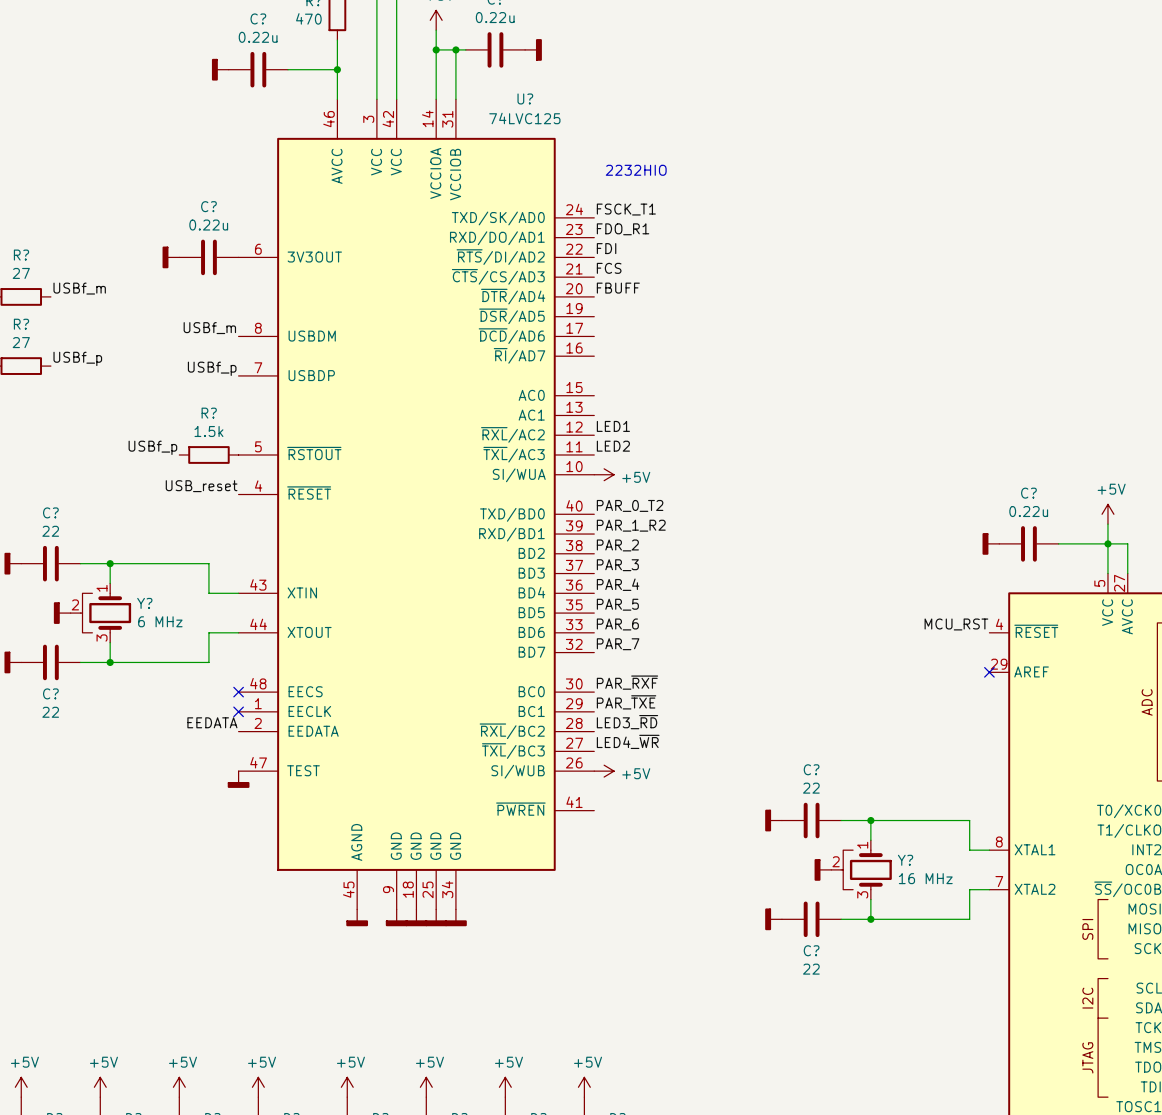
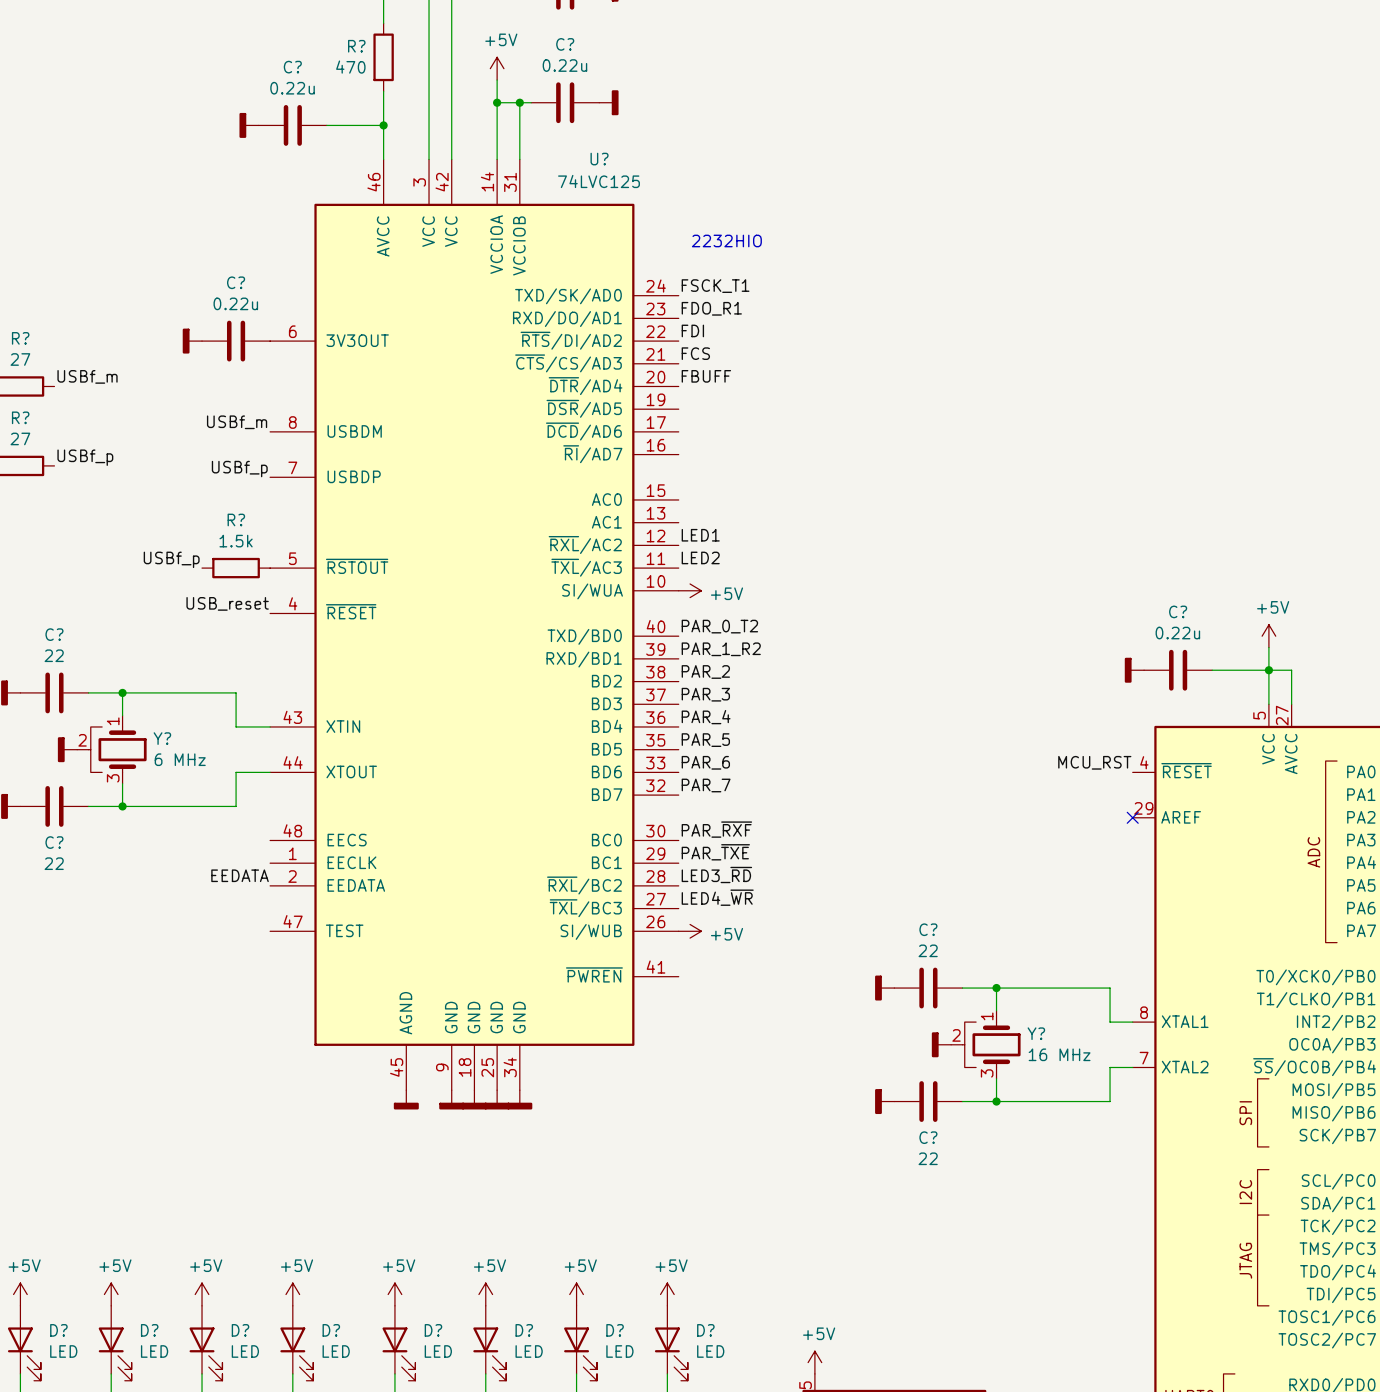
no-connect mark: (238, 692) -> none
no-connect mark: (238, 711) -> none
power symbol: (238, 779) -> none

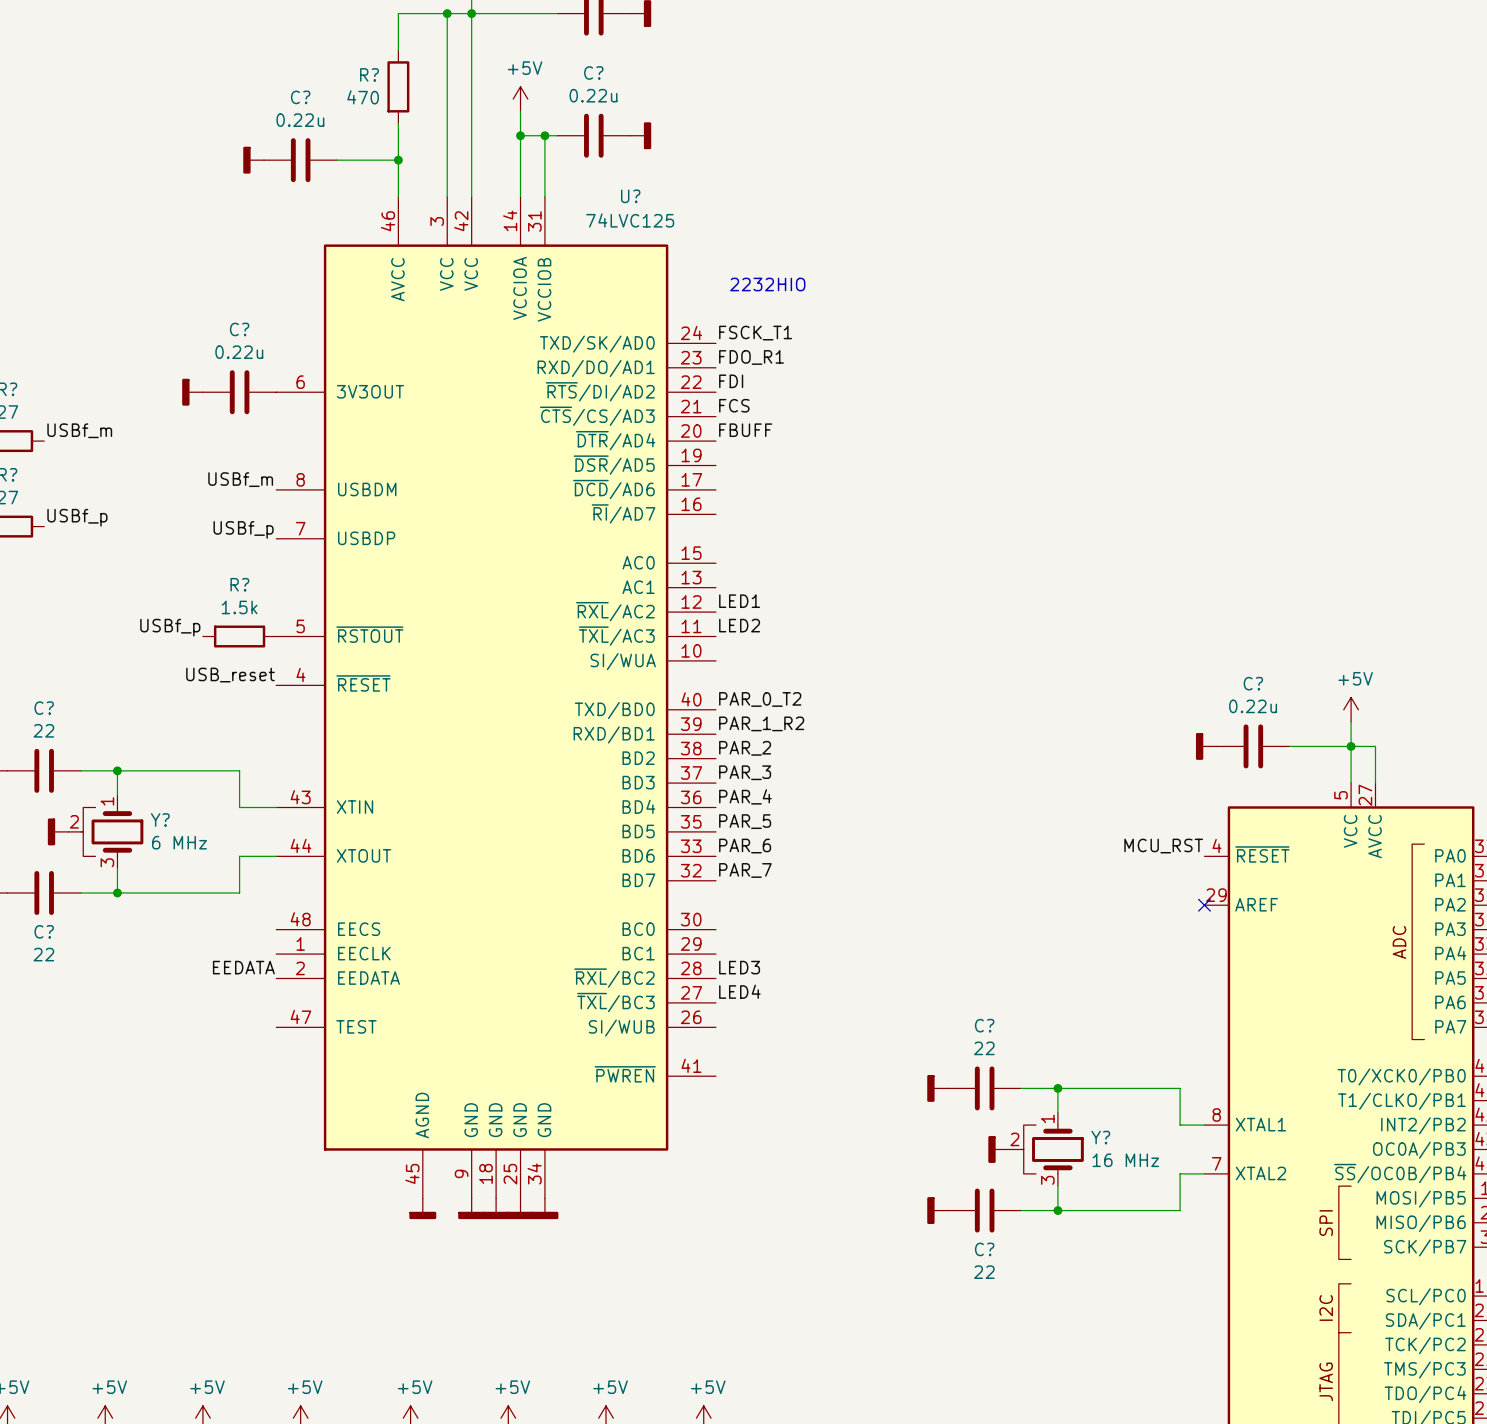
power symbol: +5V (690, 590) -> none
label: PAR_~{RXF} (716, 829) -> none
label: PAR_~{TXE} (715, 852) -> none
label: LED3_~{RD} (716, 874) -> LED3 (739, 967)
label: LED4_~{WR} (717, 897) -> LED4 (739, 991)
power symbol: +5V (690, 931) -> none

